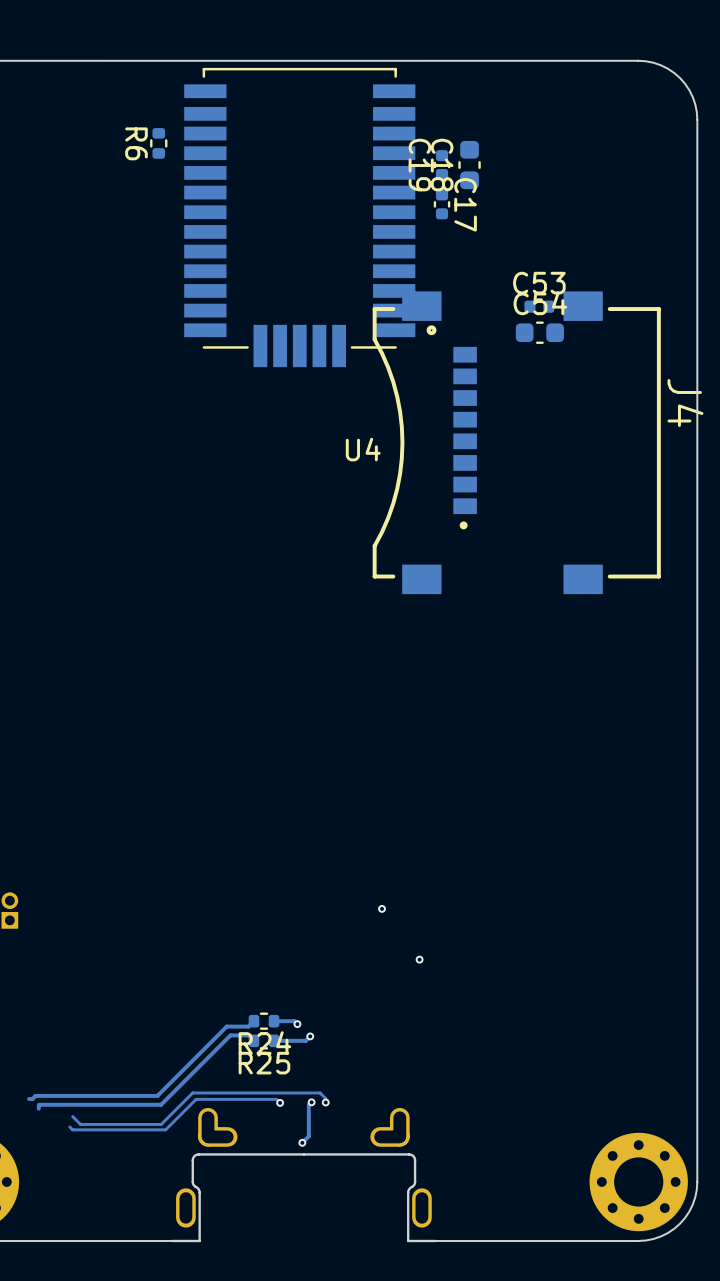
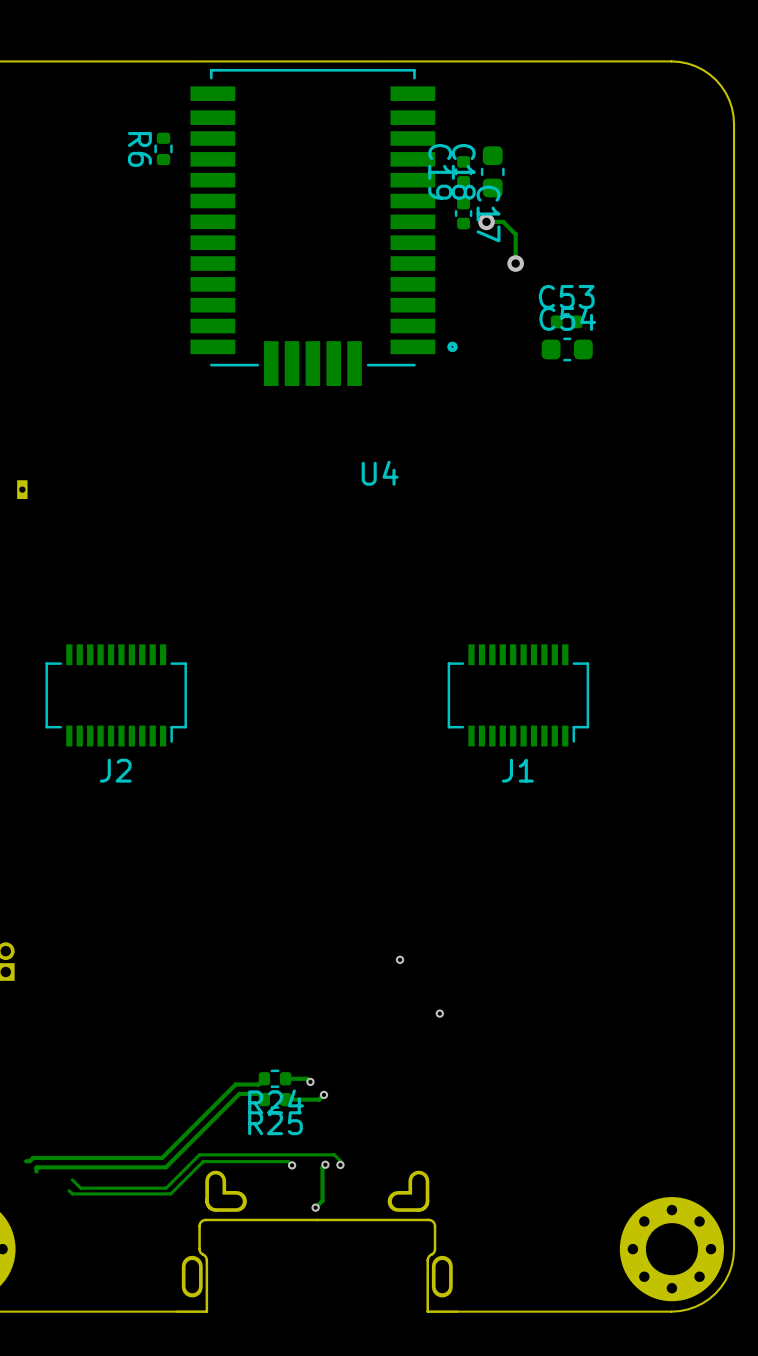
track: none -> (486, 221) (503, 221) (515, 234) (515, 263)
via: none -> (486, 221)
via: none -> (515, 263)
J4: (516, 442) -> none
part: none -> (22, 489)
J2: none -> (116, 695)
J1: none -> (518, 695)

